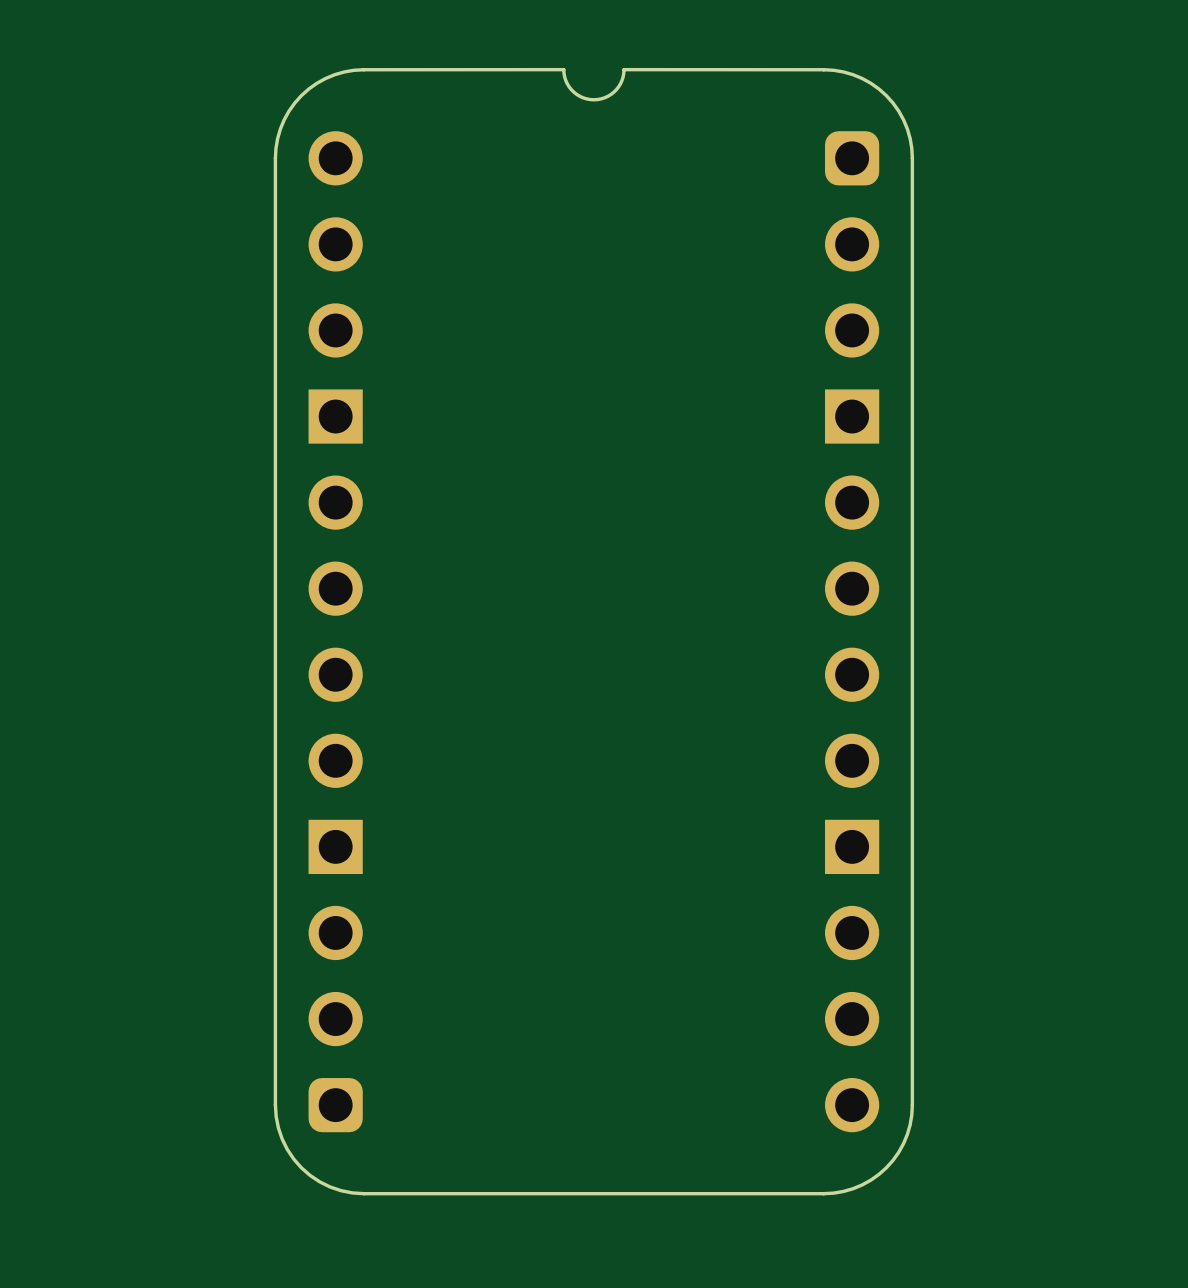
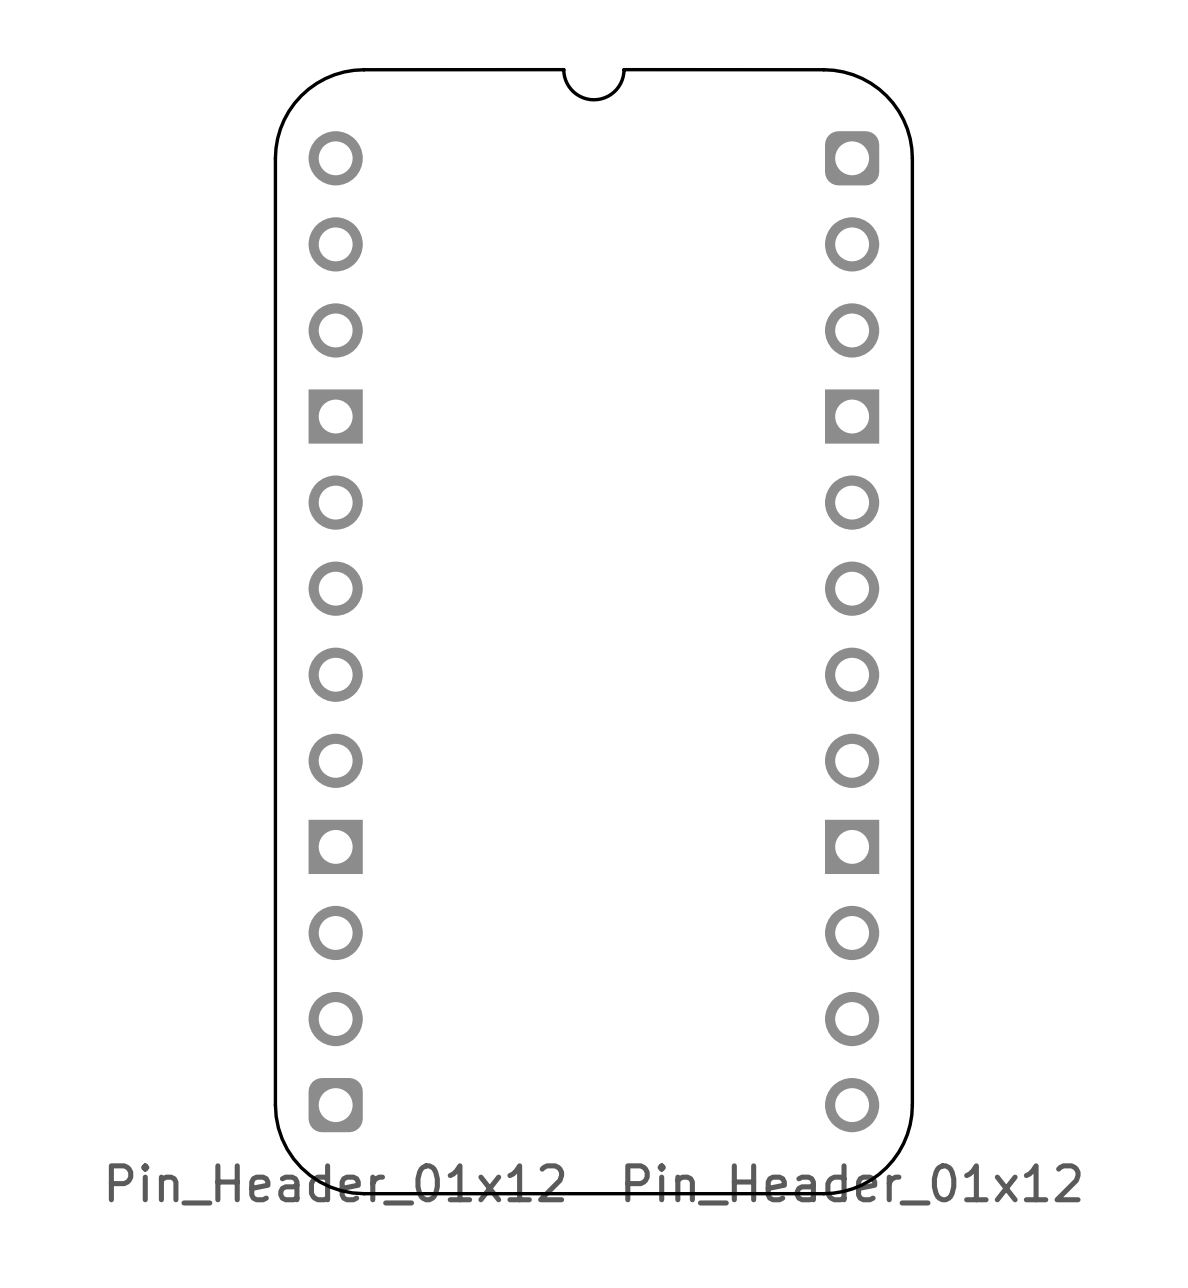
drawing: none -> [108, 1163, 1081, 1206]

